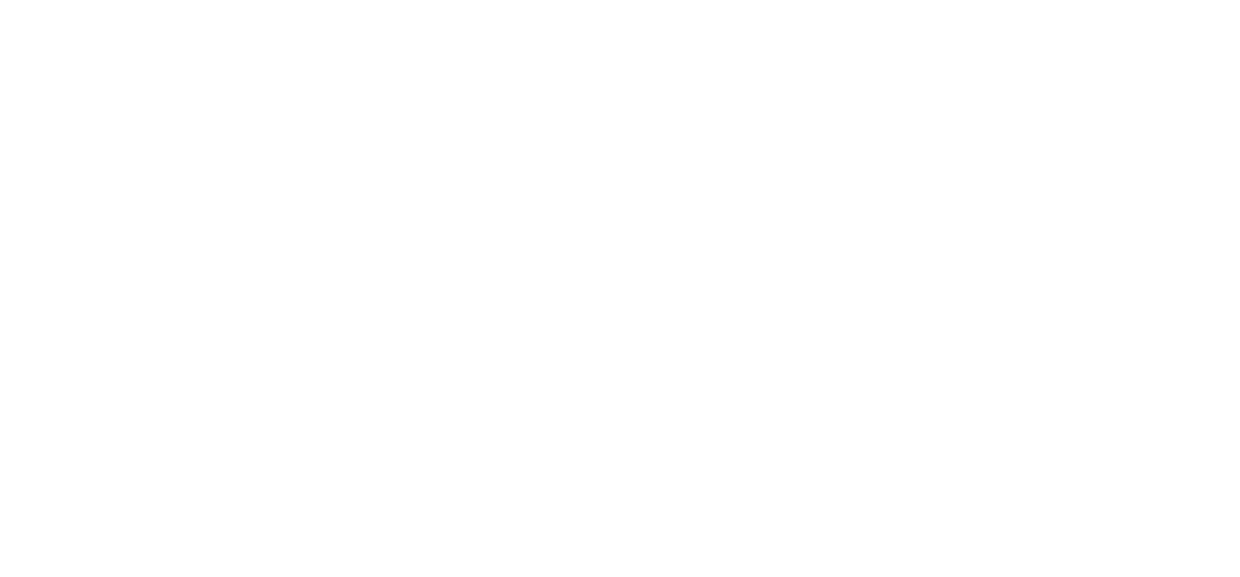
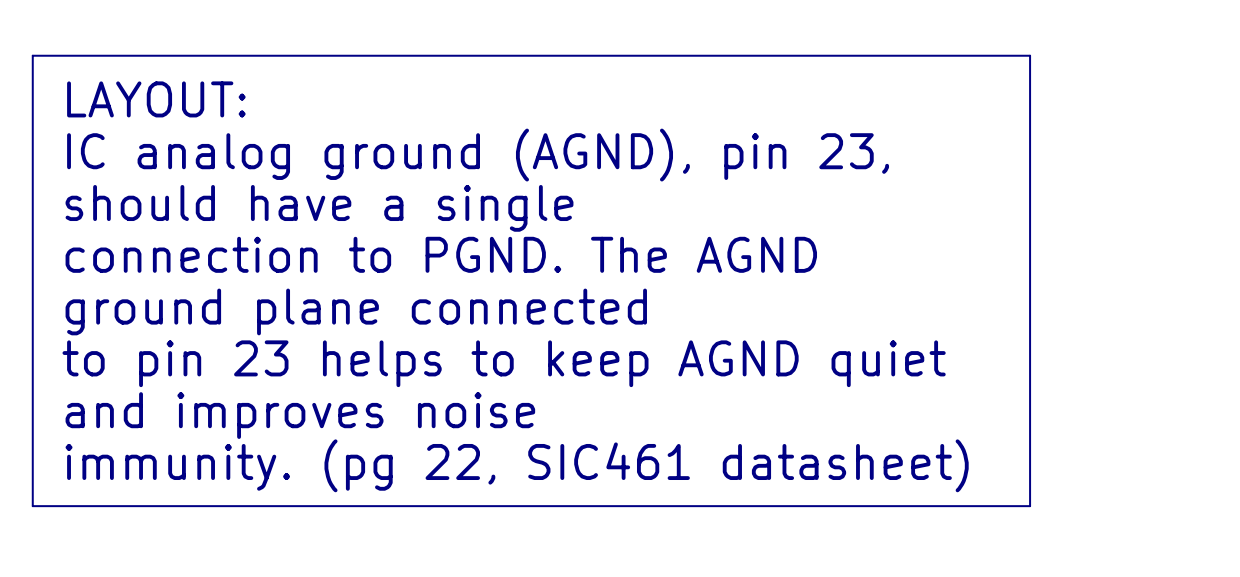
line: none -> (32, 55) (1030, 55) (1030, 506) (32, 506) (32, 55)
text: none -> LAYOUT: (156, 99)
text: none -> IC analog ground (AGND), pin 23, (478, 155)
text: none -> should have a single (319, 208)
text: none -> connection to PGND. The AGND (441, 254)
text: none -> ground plane connected (356, 311)
text: none -> to pin 23 helps to keep AGND quiet (504, 363)
text: none -> and improves noise (300, 415)
text: none -> immunity. (pg 22, SIC461 datasheet) (517, 465)

